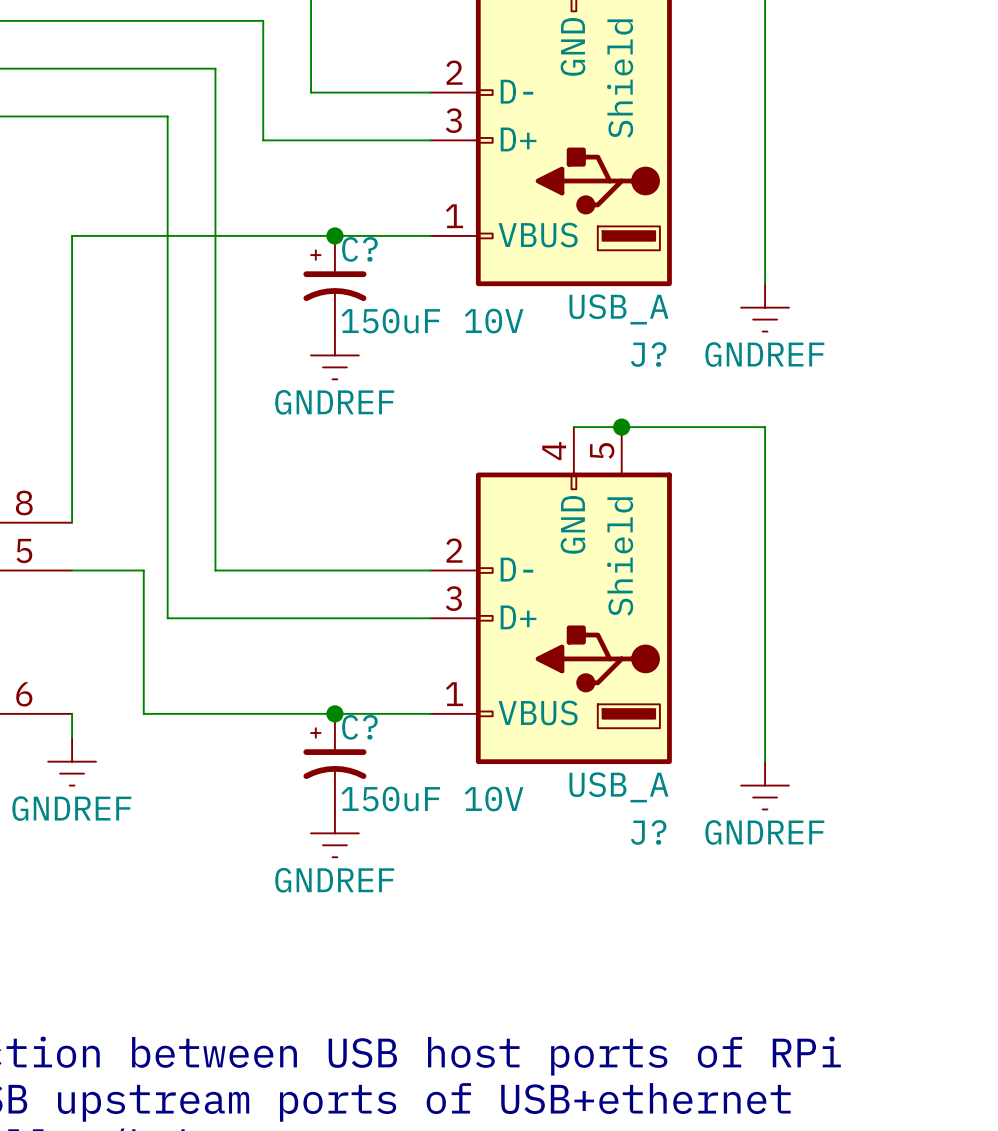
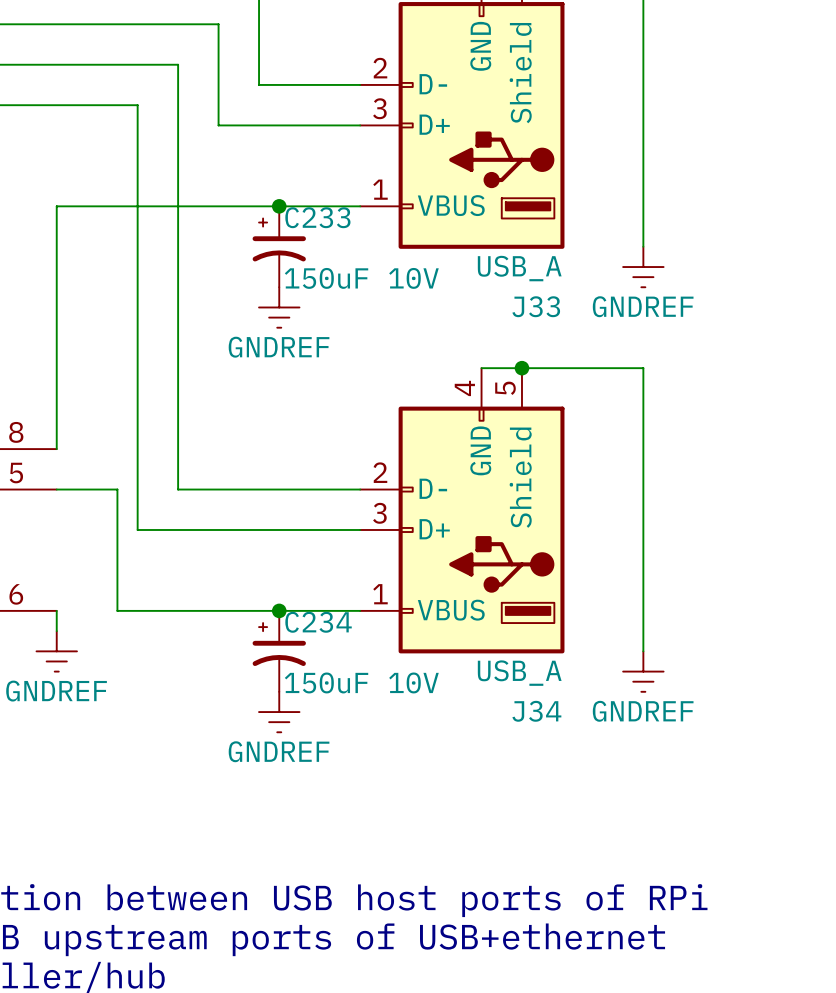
C? name: C? (359, 249) -> C233 (317, 217)
J? name: J? (648, 354) -> J33 (536, 306)
C? name: C? (359, 727) -> C234 (318, 622)
J? name: J? (648, 832) -> J34 (536, 711)

